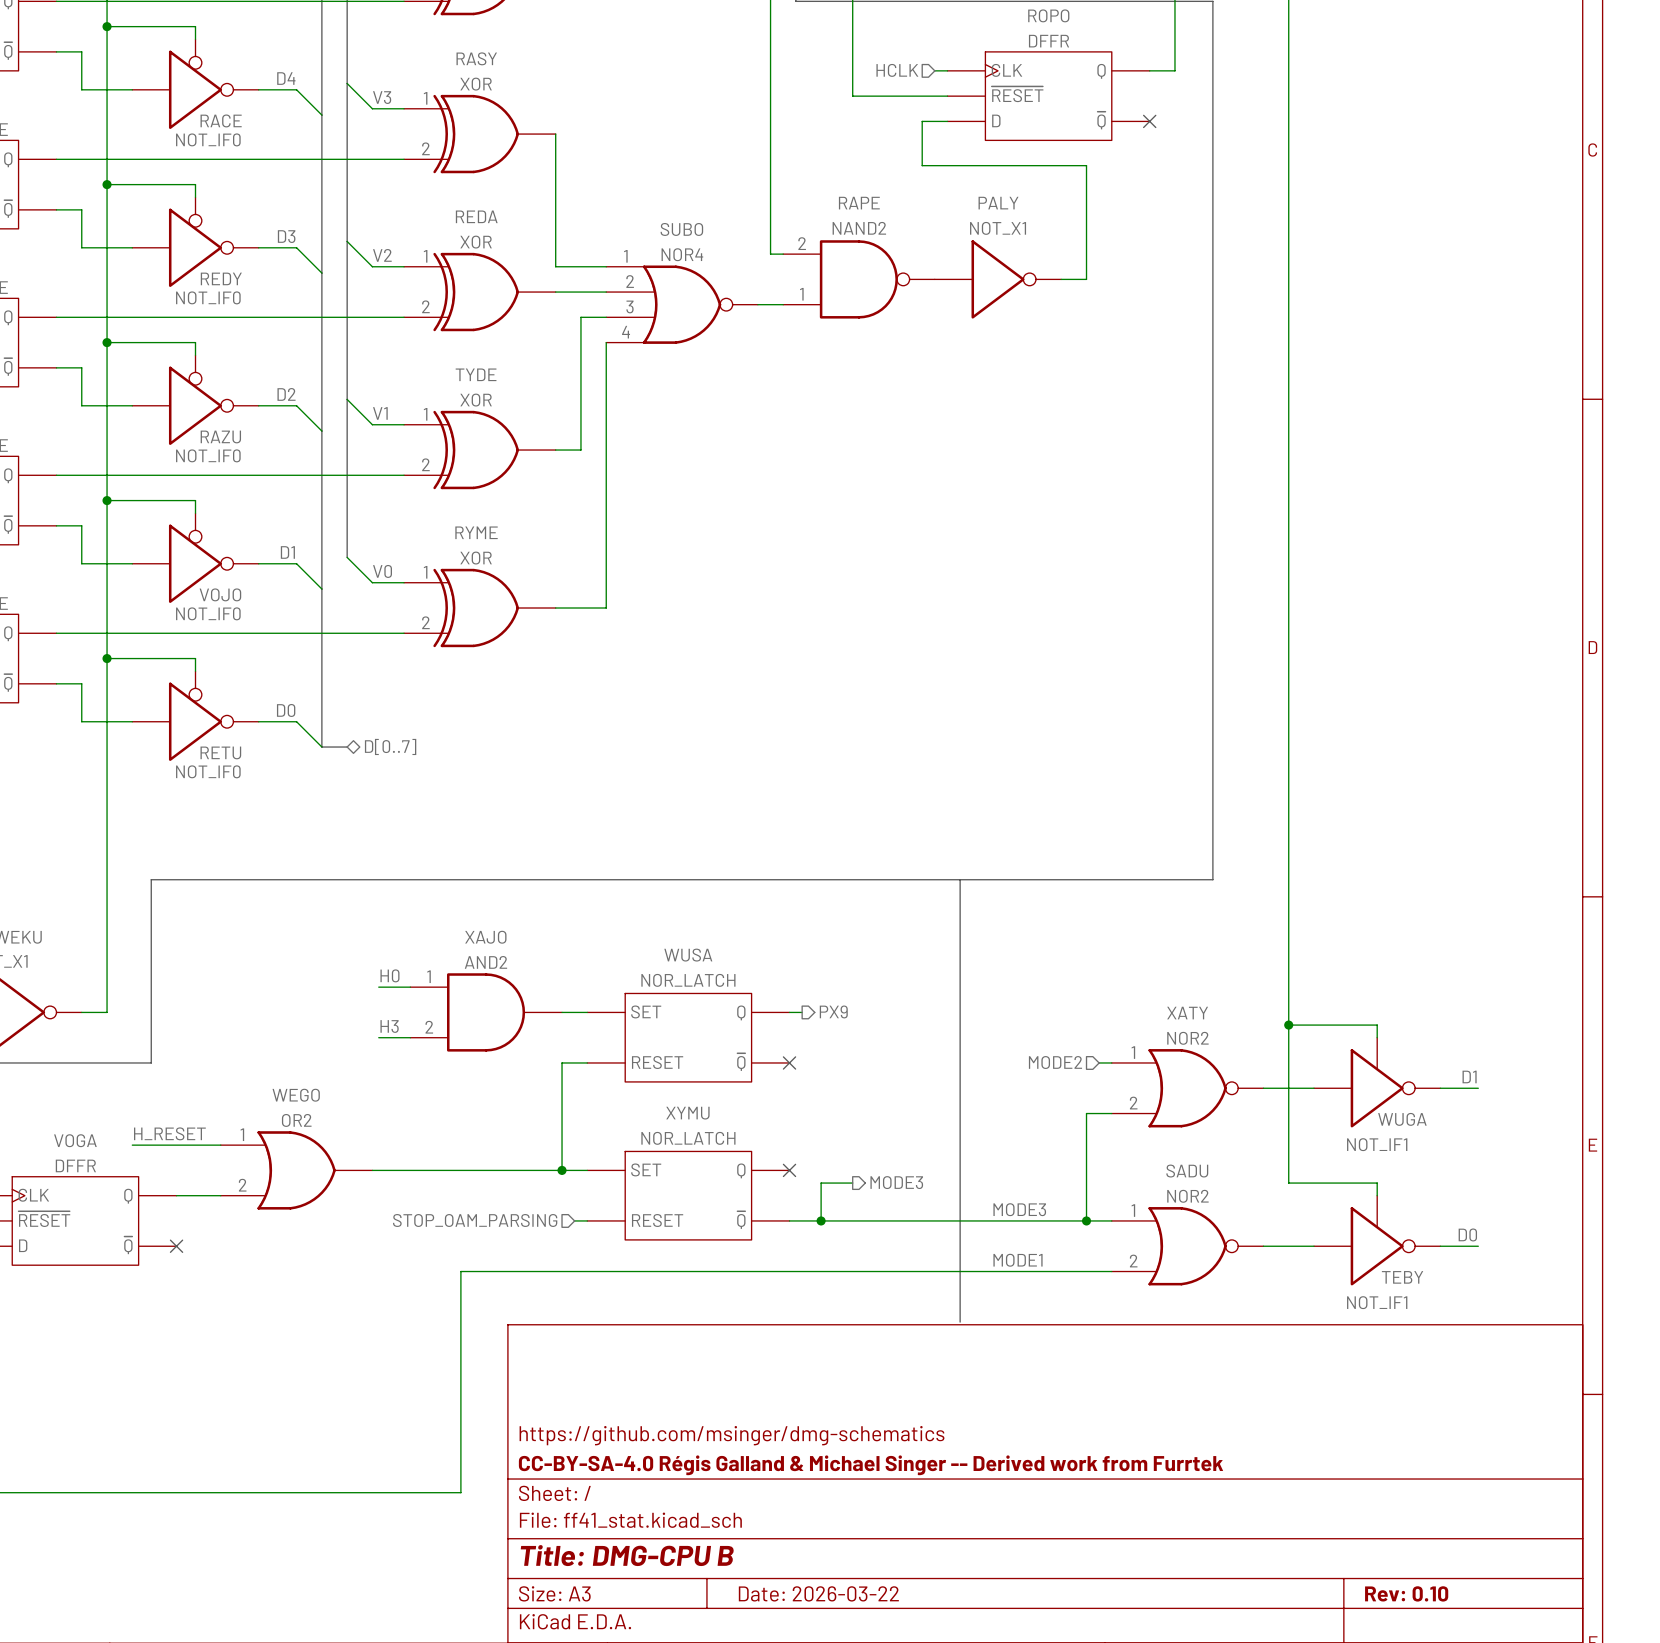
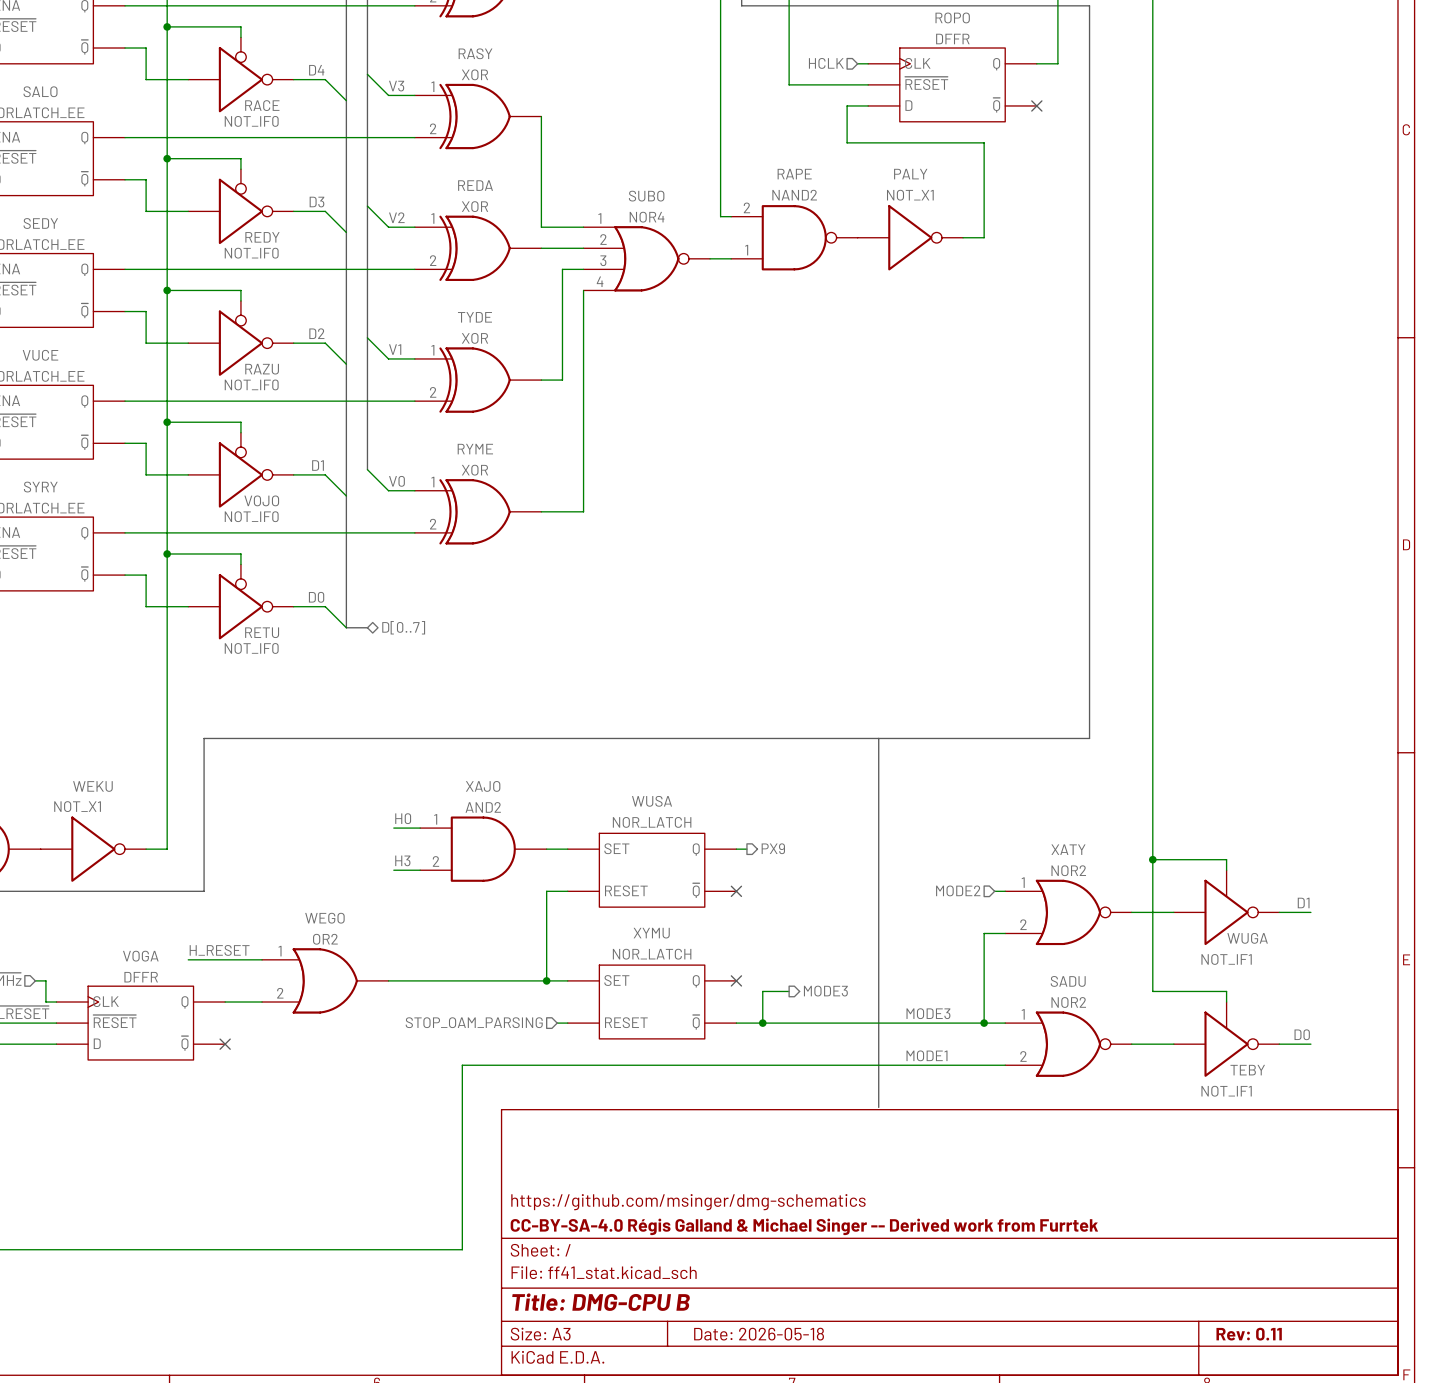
title block: Date: 2026-03-22 (818, 1593) -> Date: 2026-05-18 (759, 1334)
title block: Rev: 0.10 (1406, 1593) -> Rev: 0.11 (1249, 1334)

